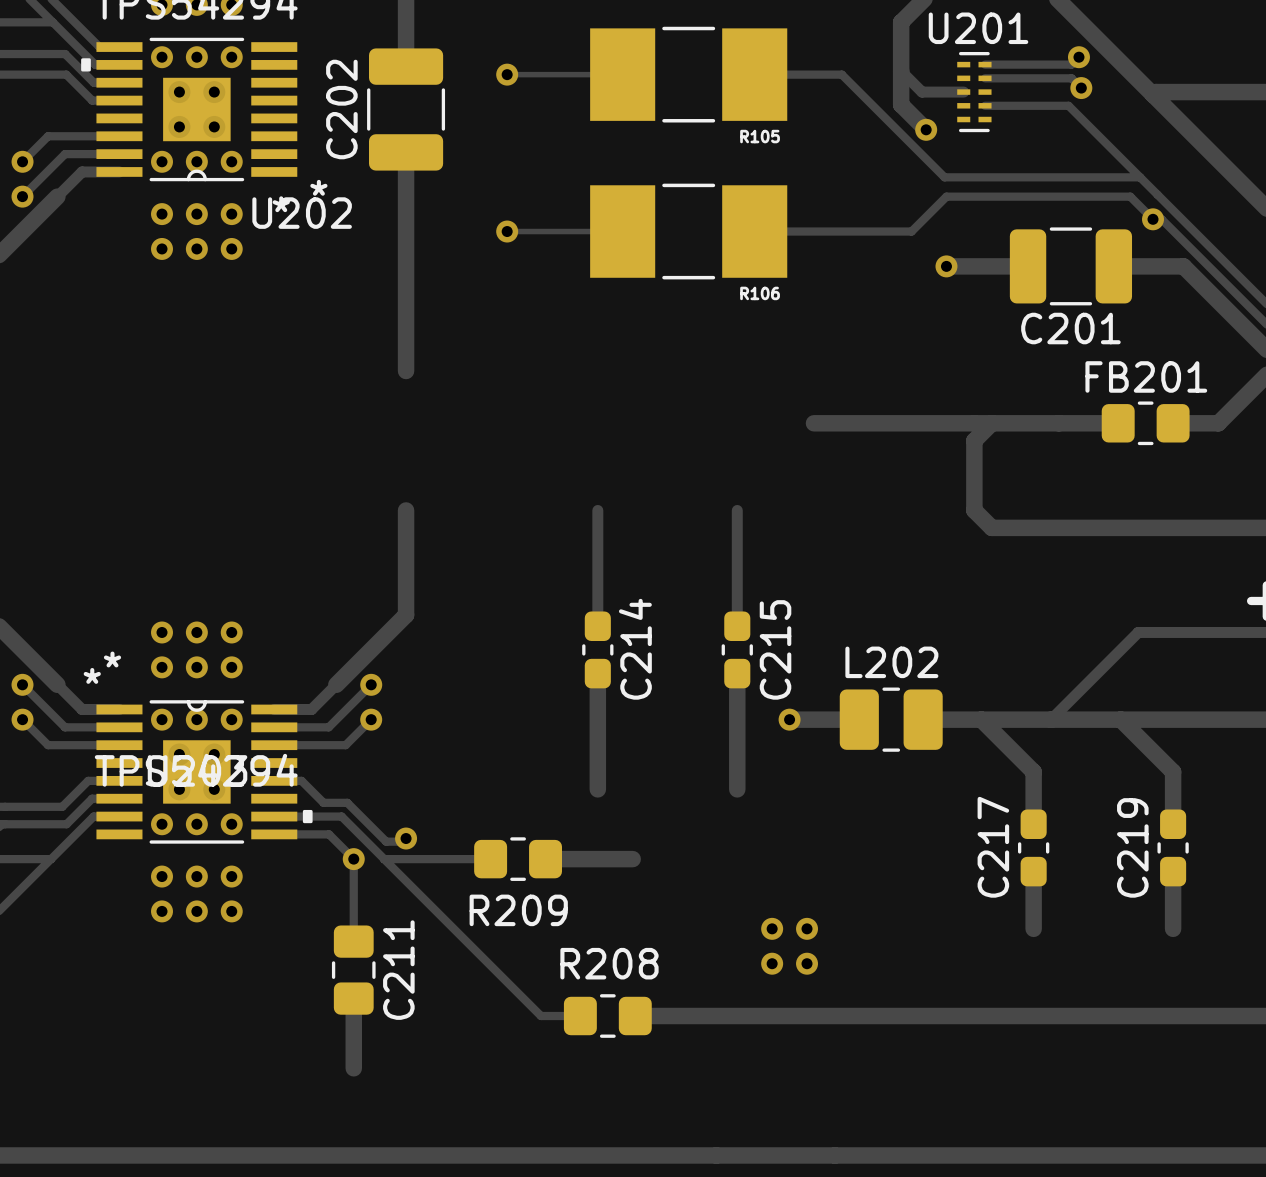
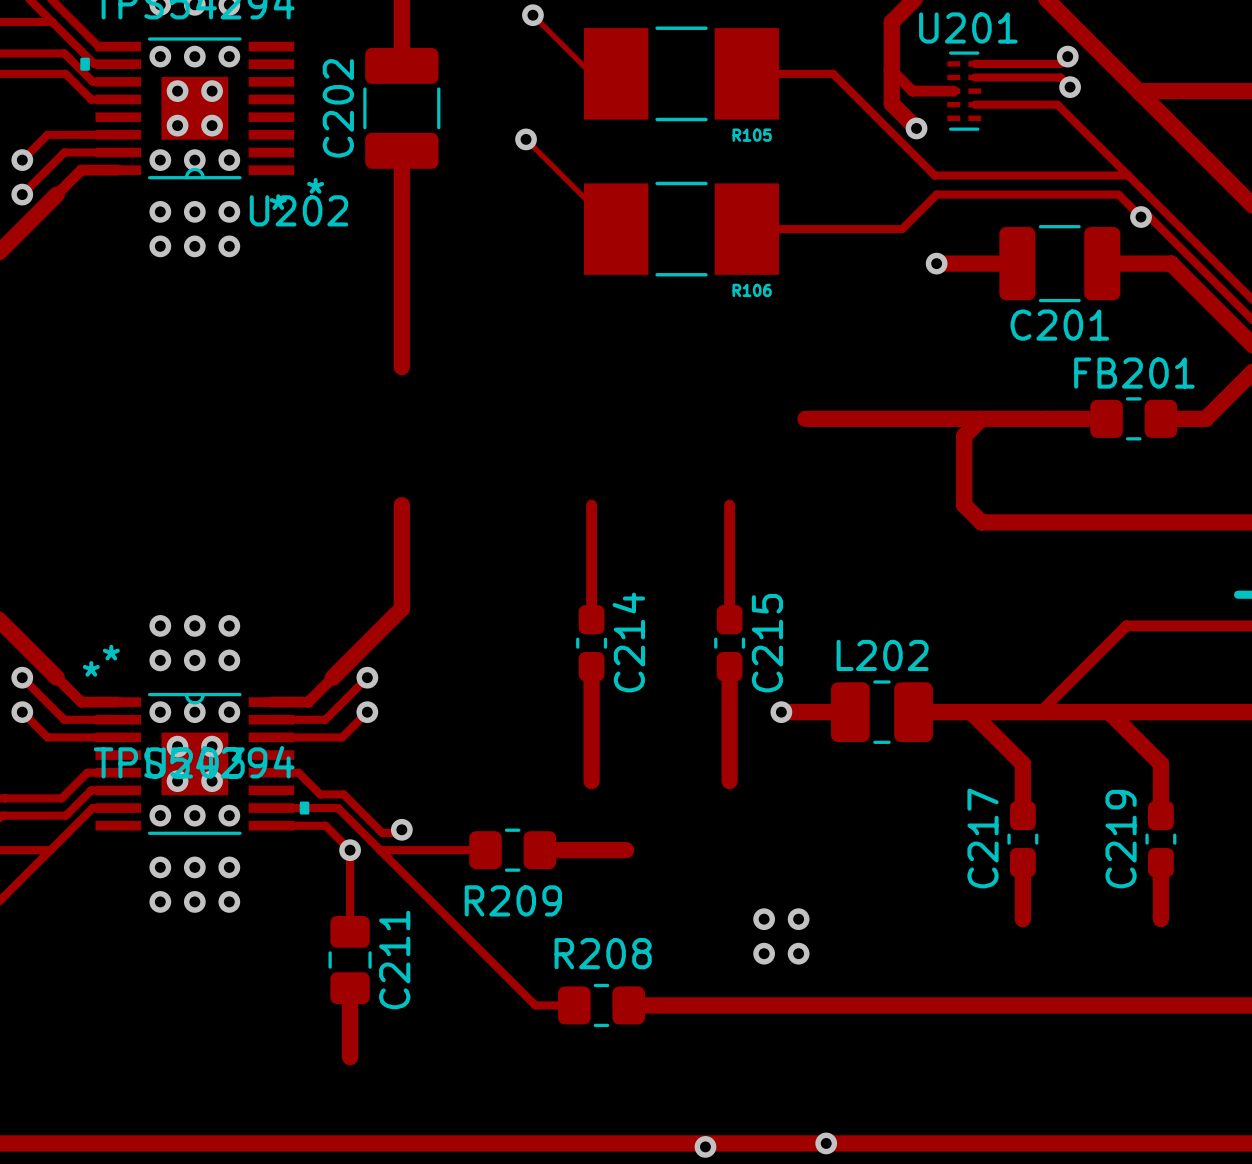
via: none -> (532, 15)
track: (507, 74) (597, 74) -> (532, 15) (591, 73)
via: (507, 74) -> none
via: none -> (526, 139)
track: (507, 231) (622, 231) -> (526, 139) (615, 229)
via: (507, 231) -> none
via: none -> (826, 1143)
via: none -> (705, 1146)

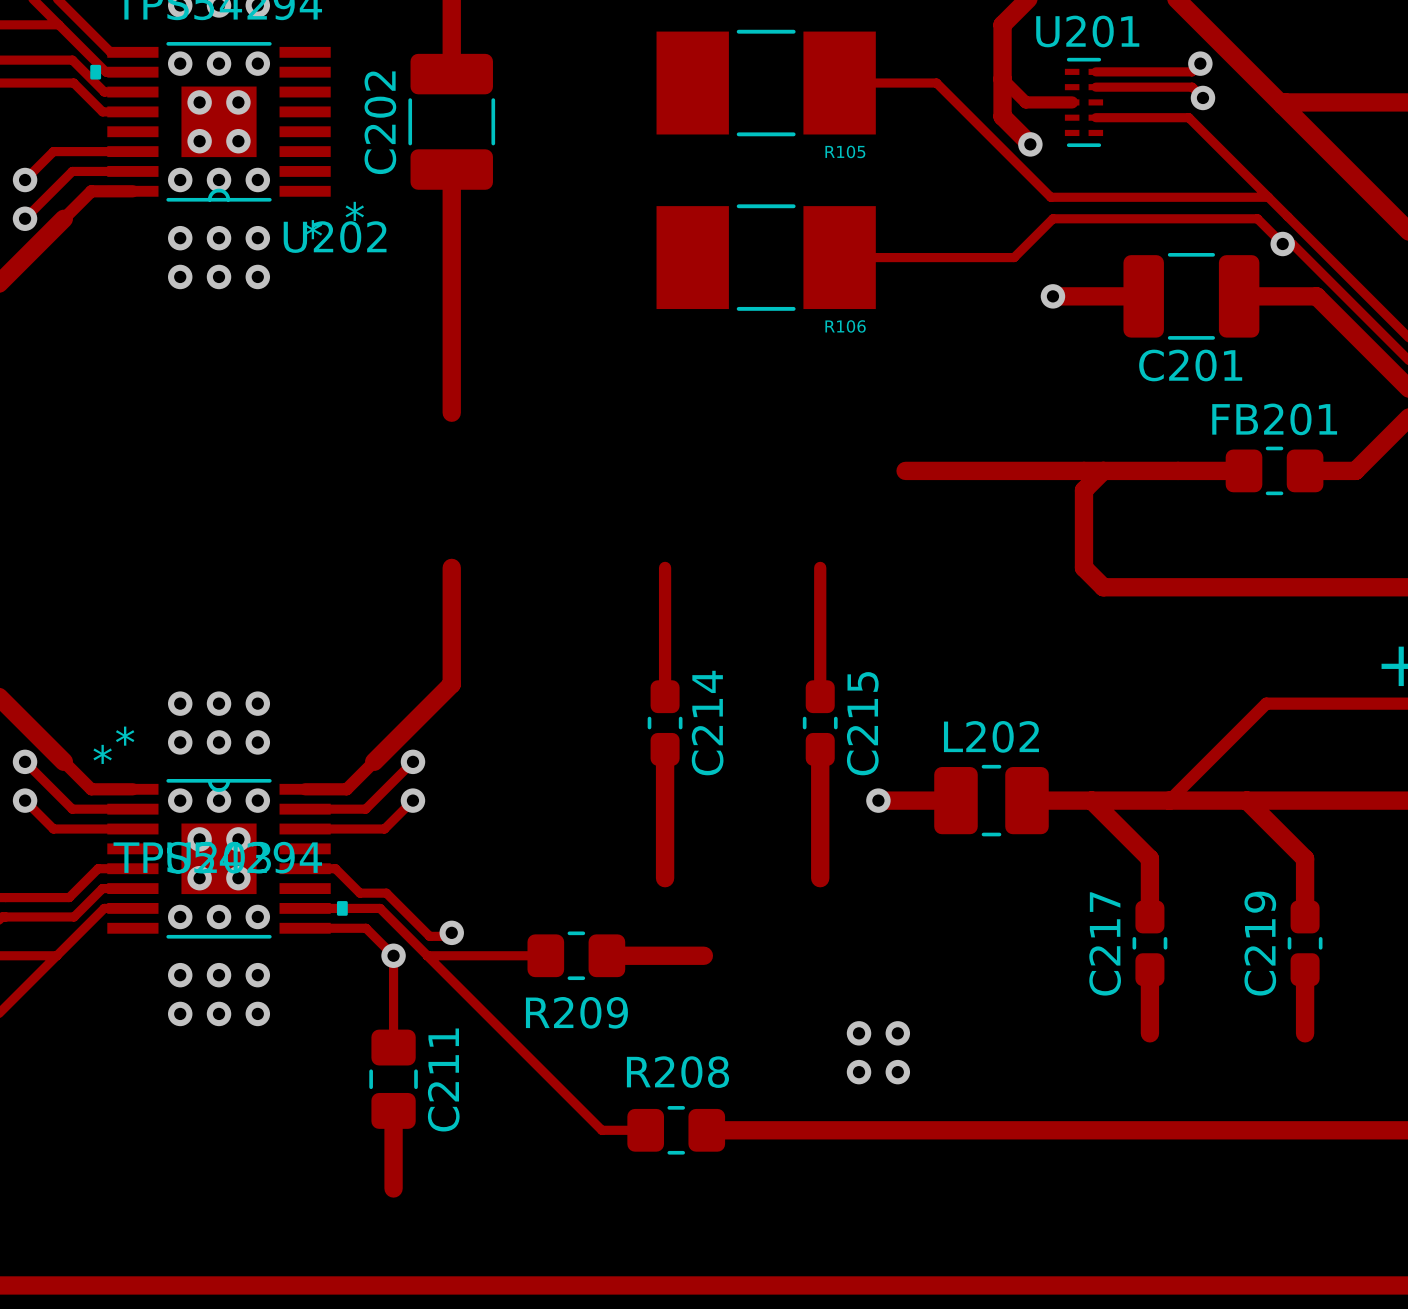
track: (532, 15) (591, 73) (616, 73) -> none
via: (532, 15) -> none
track: (526, 139) (615, 229) -> none
via: (526, 139) -> none
via: (826, 1143) -> none
via: (705, 1146) -> none

